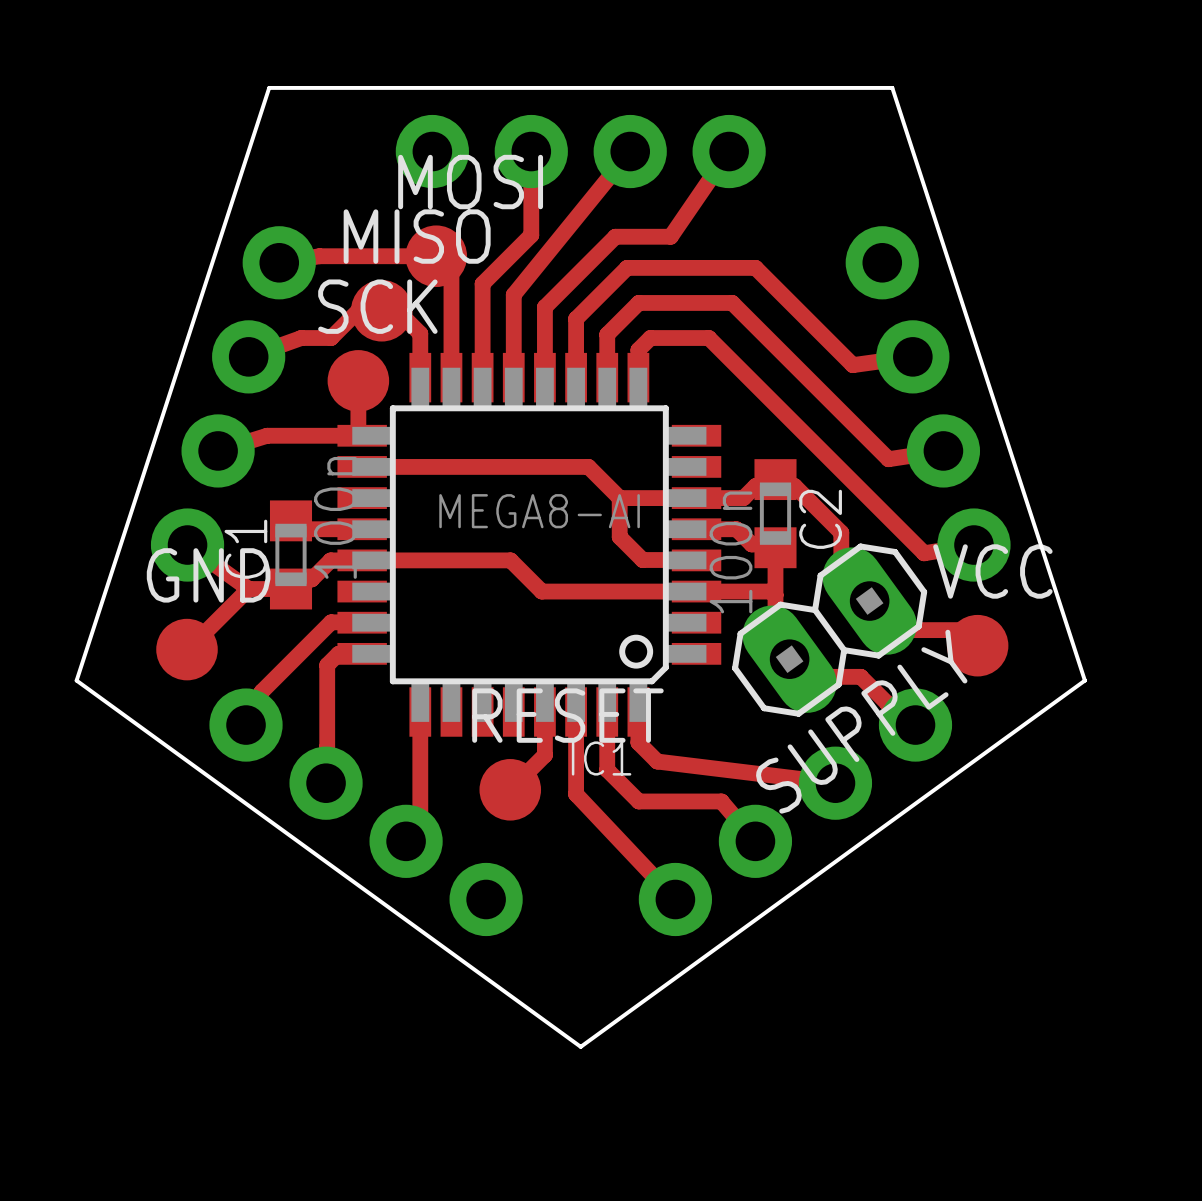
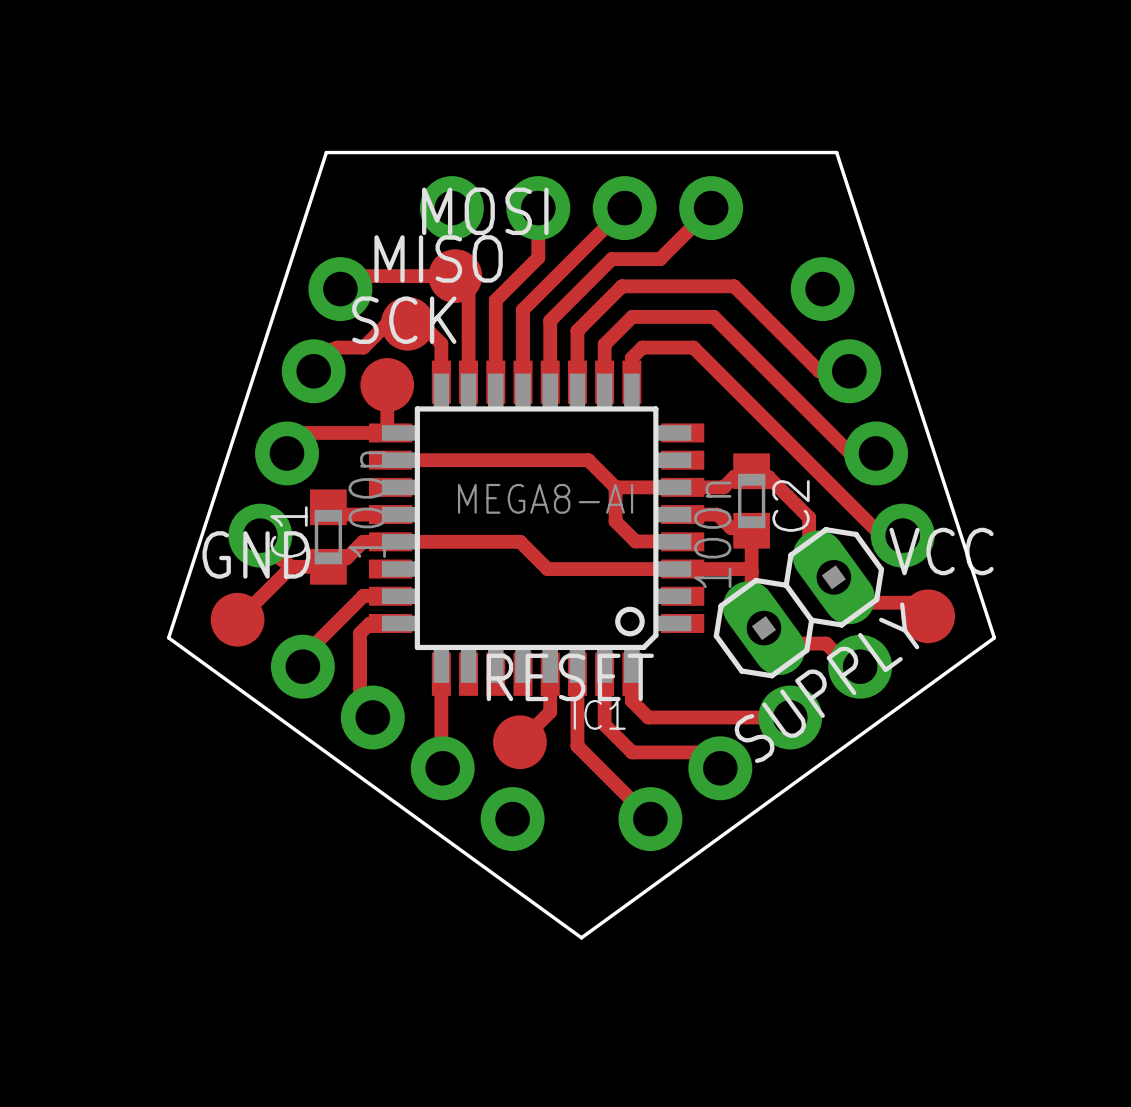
board edge: (269, 87) (892, 87) (1084, 680) (580, 1046) (76, 680) (269, 87) -> (326, 152) (168, 637) (581, 937) (994, 637) (836, 152) (326, 152)
part position: (580, 151) -> (581, 208)
track: (630, 151) (513, 294) -> (624, 208) (523, 309)
track: (729, 151) (670, 236) -> (711, 208) (660, 259)
part position: (233, 403) -> (300, 412)
part position: (928, 403) -> (862, 412)
track: (657, 761) (835, 783) -> (648, 717) (790, 717)
track: (576, 794) (675, 899) -> (577, 746) (650, 819)
part position: (366, 812) -> (407, 742)
part position: (795, 812) -> (755, 742)

